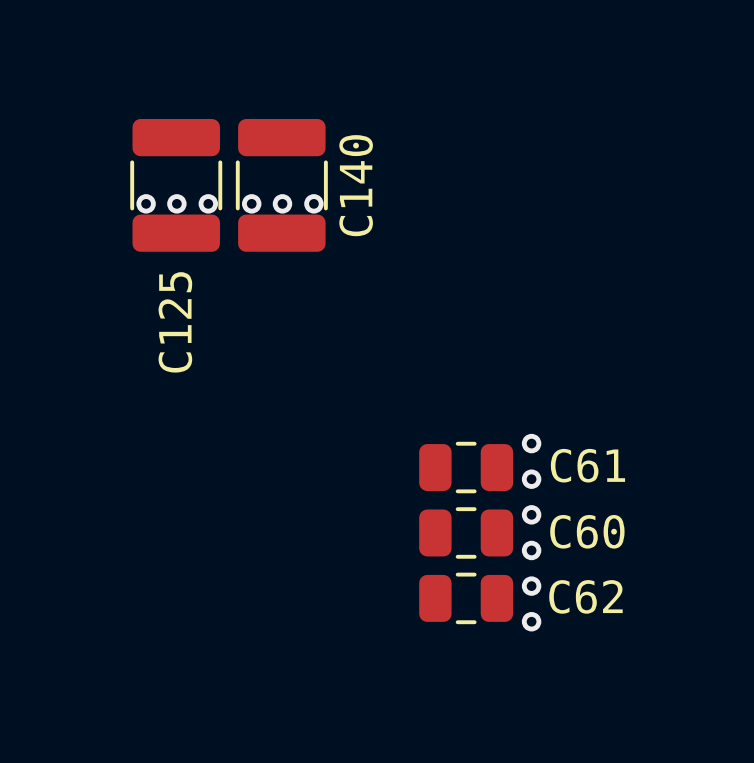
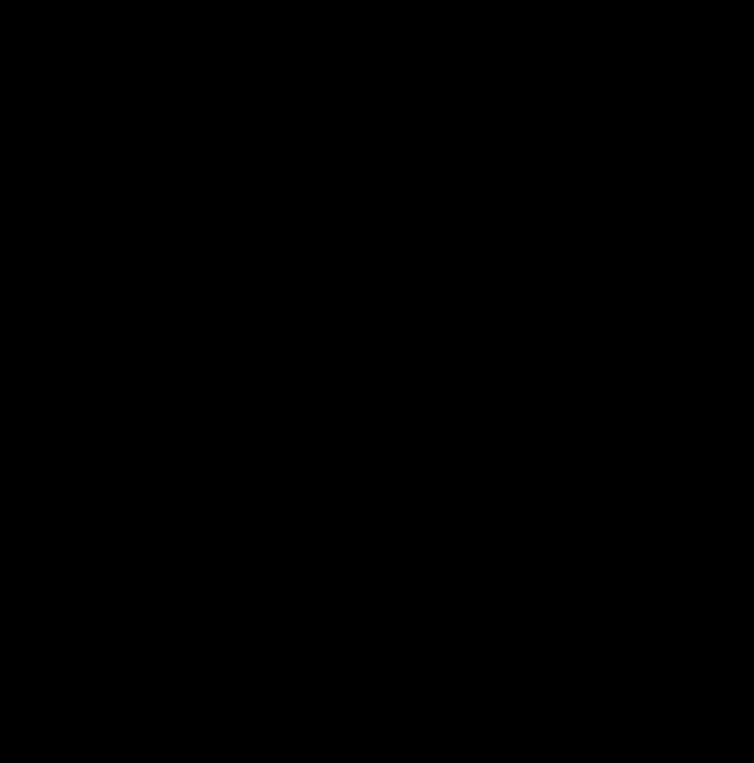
C125: (176, 185) -> none
C140: (281, 185) -> none
via: (146, 203) -> none
via: (176, 203) -> none
via: (208, 203) -> none
via: (251, 203) -> none
via: (282, 203) -> none
via: (313, 203) -> none
via: (531, 443) -> none
C61: (466, 467) -> none
via: (531, 479) -> none
via: (531, 514) -> none
C60: (466, 532) -> none
via: (531, 550) -> none
via: (531, 586) -> none
C62: (466, 598) -> none
via: (531, 621) -> none

